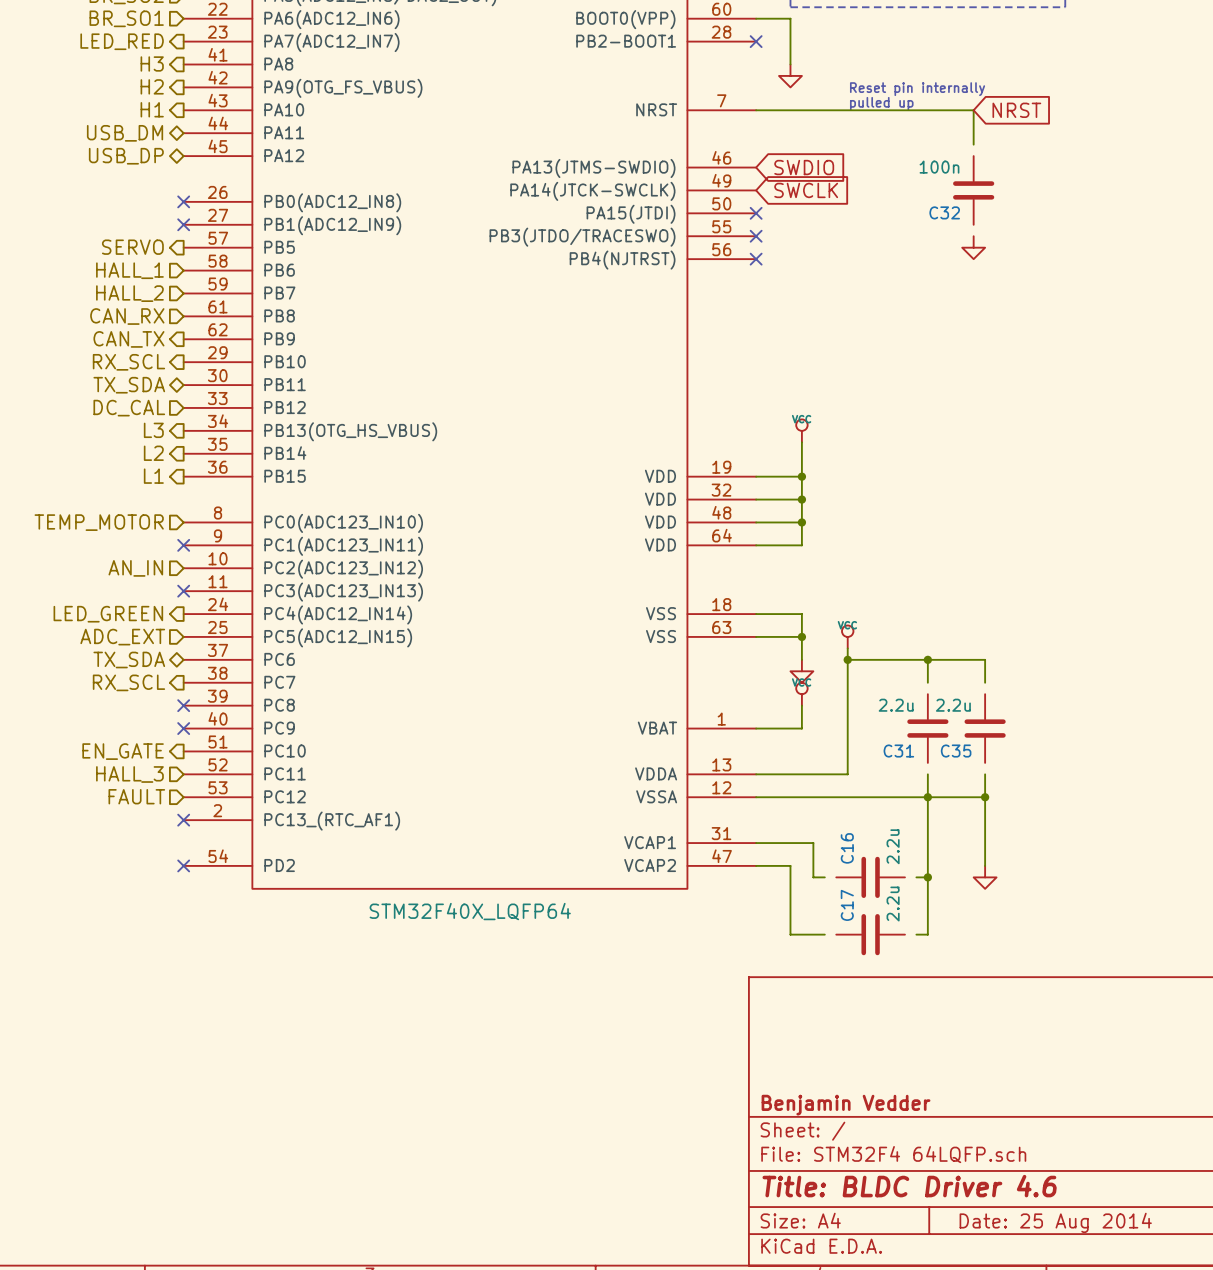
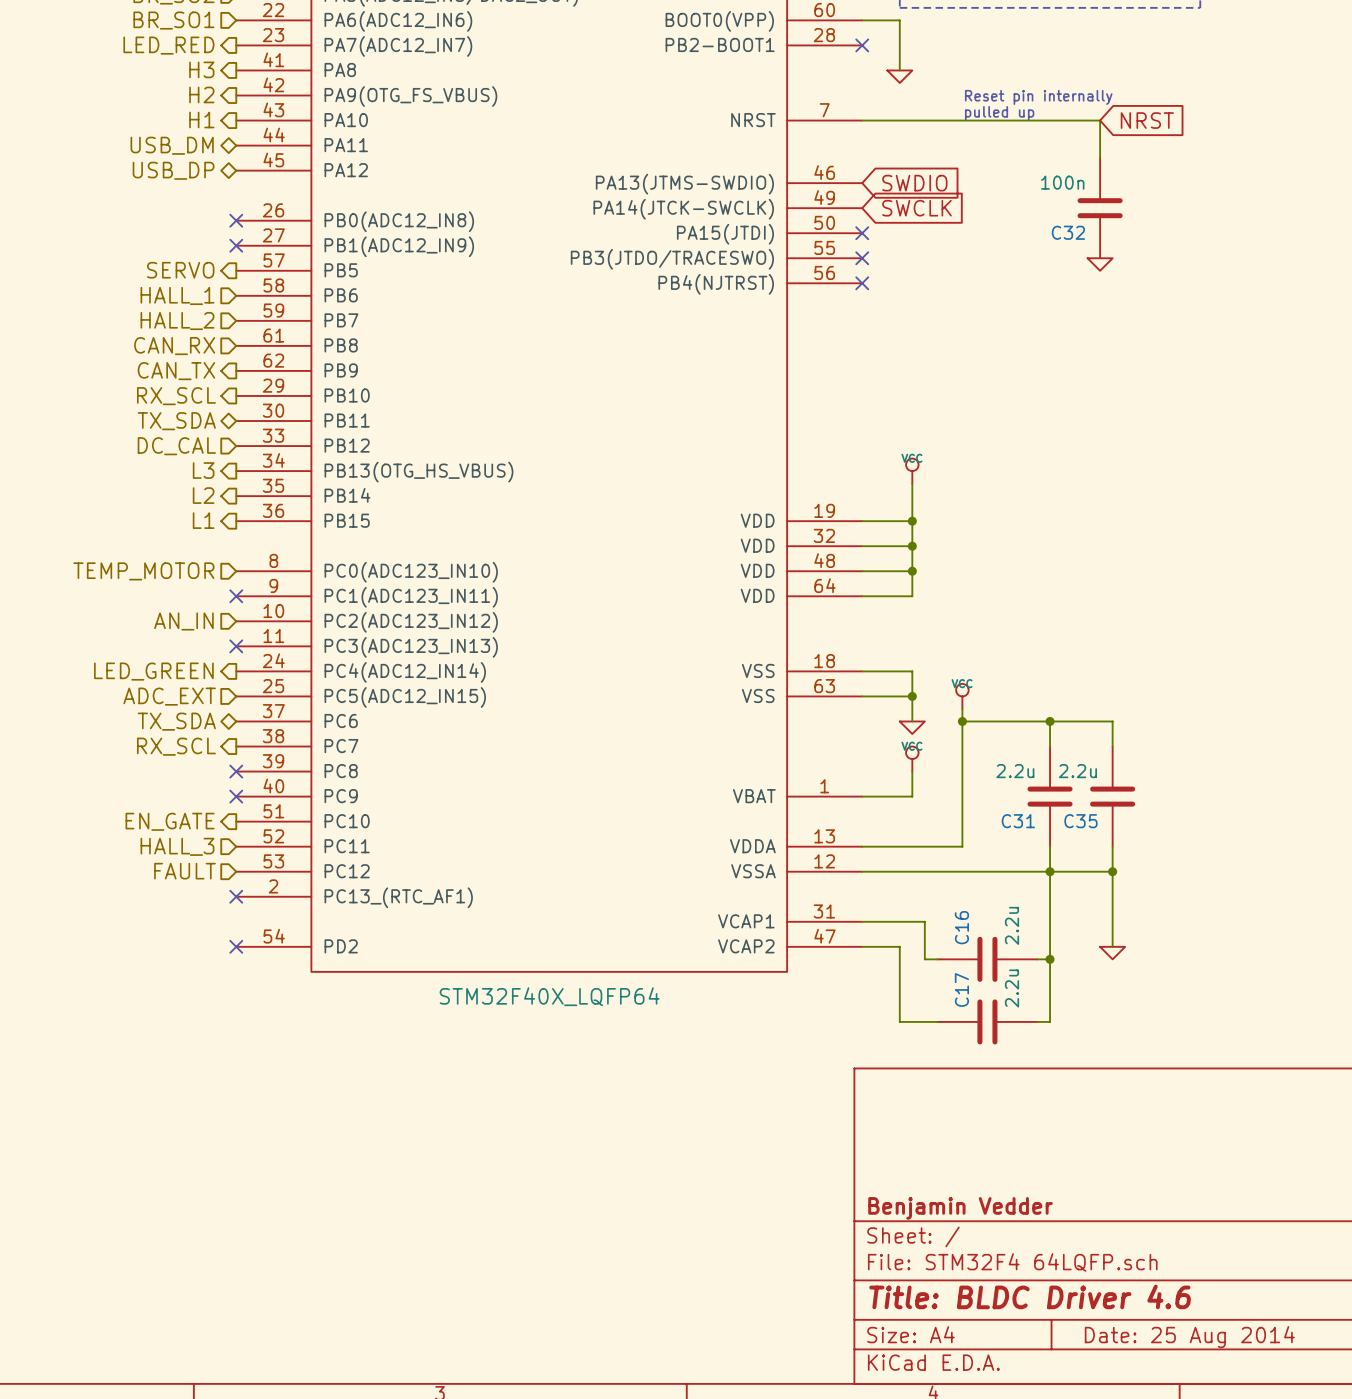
power symbol shape: [779, 64, 802, 88] -> [887, 70, 913, 83]
C32 symbol: [953, 156, 995, 225] -> [1077, 158, 1123, 259]
power symbol shape: [962, 236, 986, 260] -> [1087, 258, 1113, 271]
power symbol shape: [790, 659, 814, 683] -> [899, 721, 925, 735]
C31 symbol: [907, 694, 949, 763] -> [1027, 746, 1073, 847]
C35 symbol: [964, 694, 1006, 763] -> [1090, 746, 1136, 847]
C16 symbol: [836, 856, 905, 898] -> [937, 936, 1038, 982]
power symbol shape: [973, 865, 997, 889] -> [1100, 946, 1126, 960]
C17 symbol: [836, 914, 905, 956] -> [937, 999, 1038, 1045]

